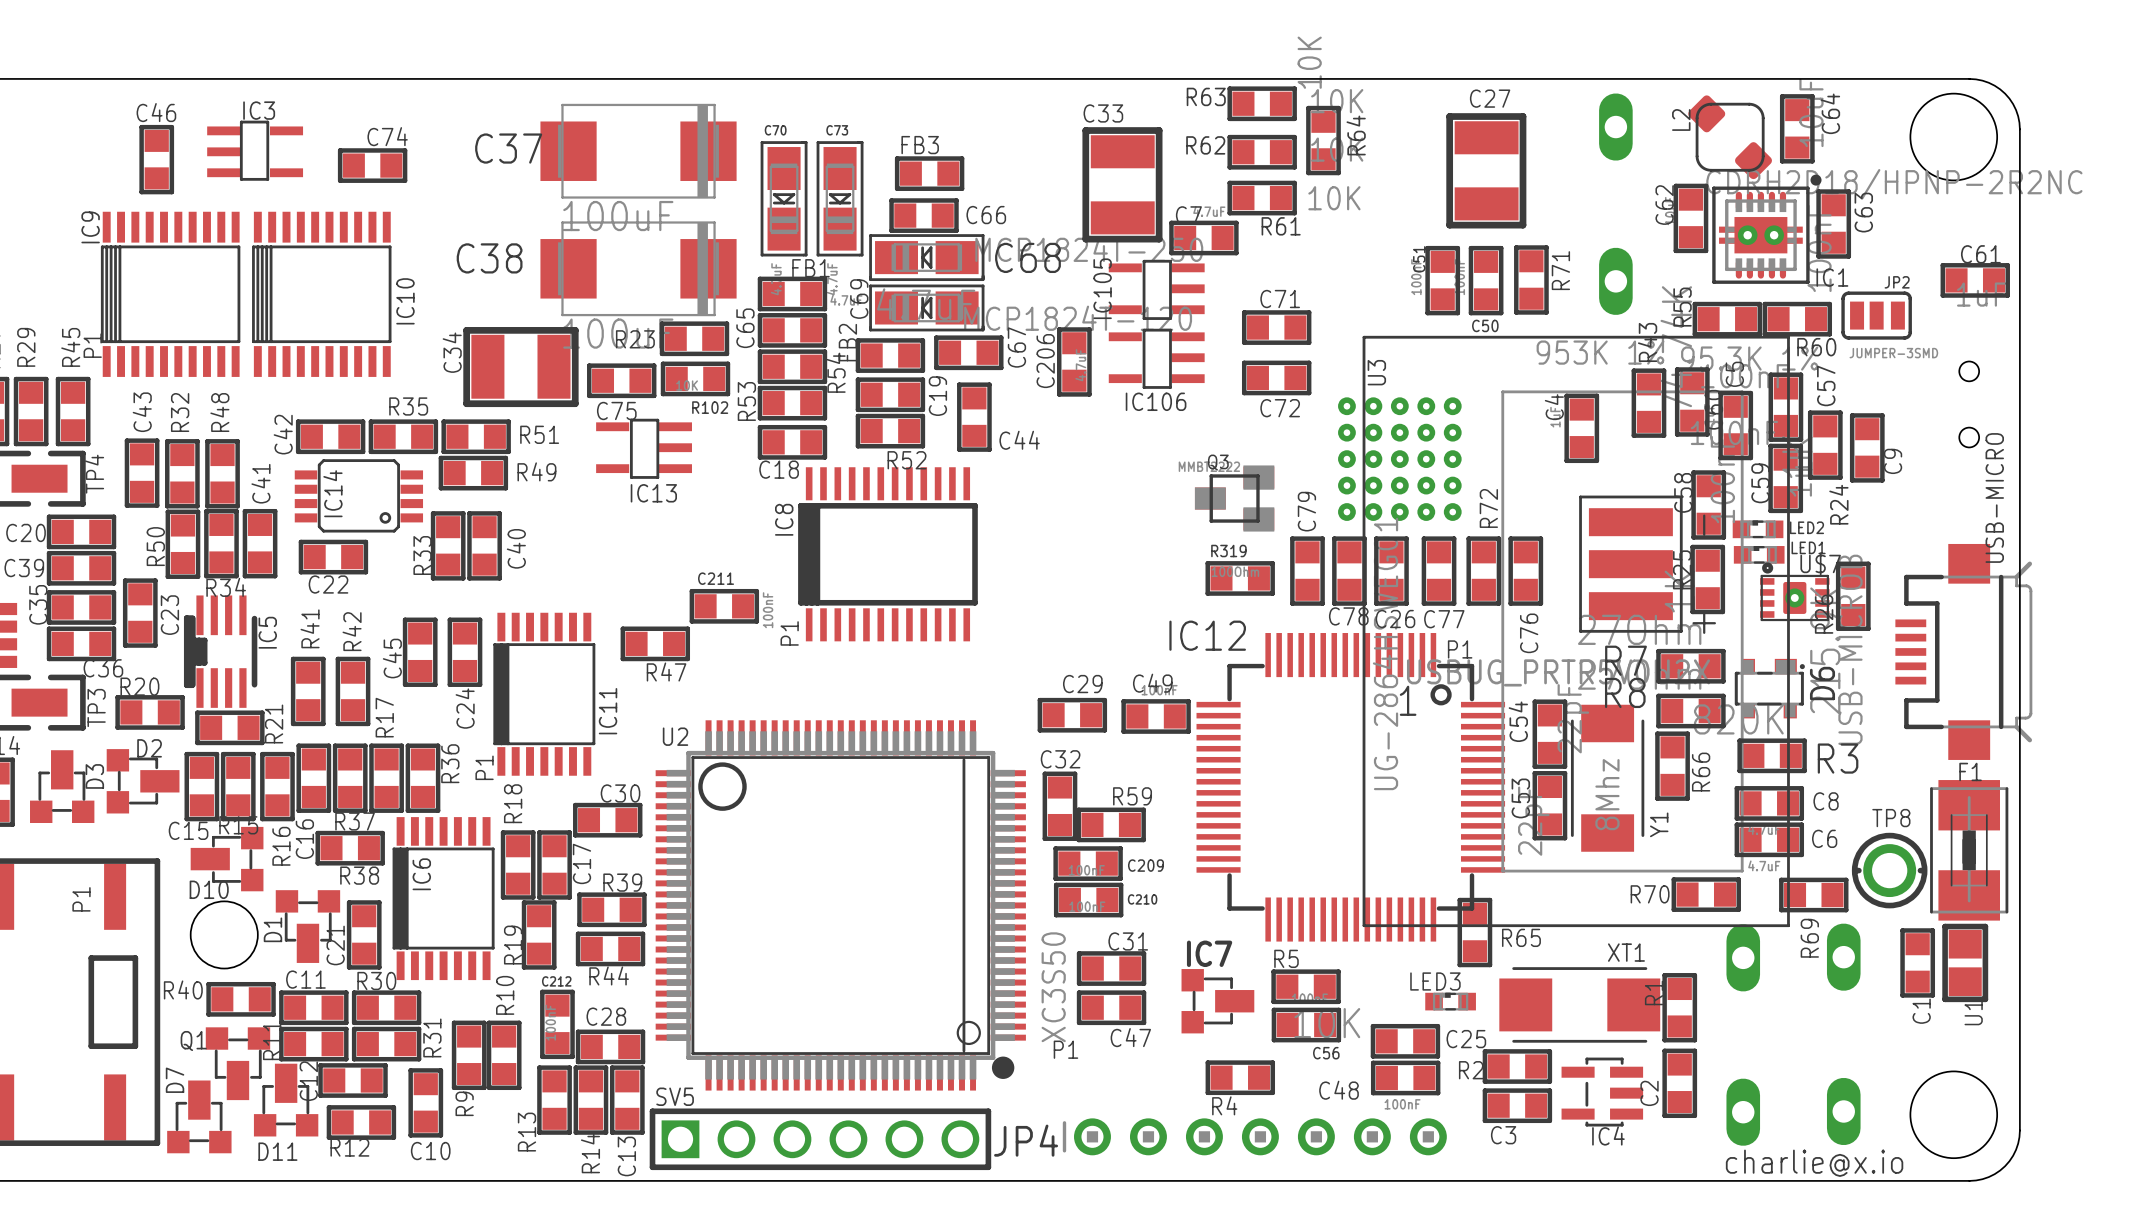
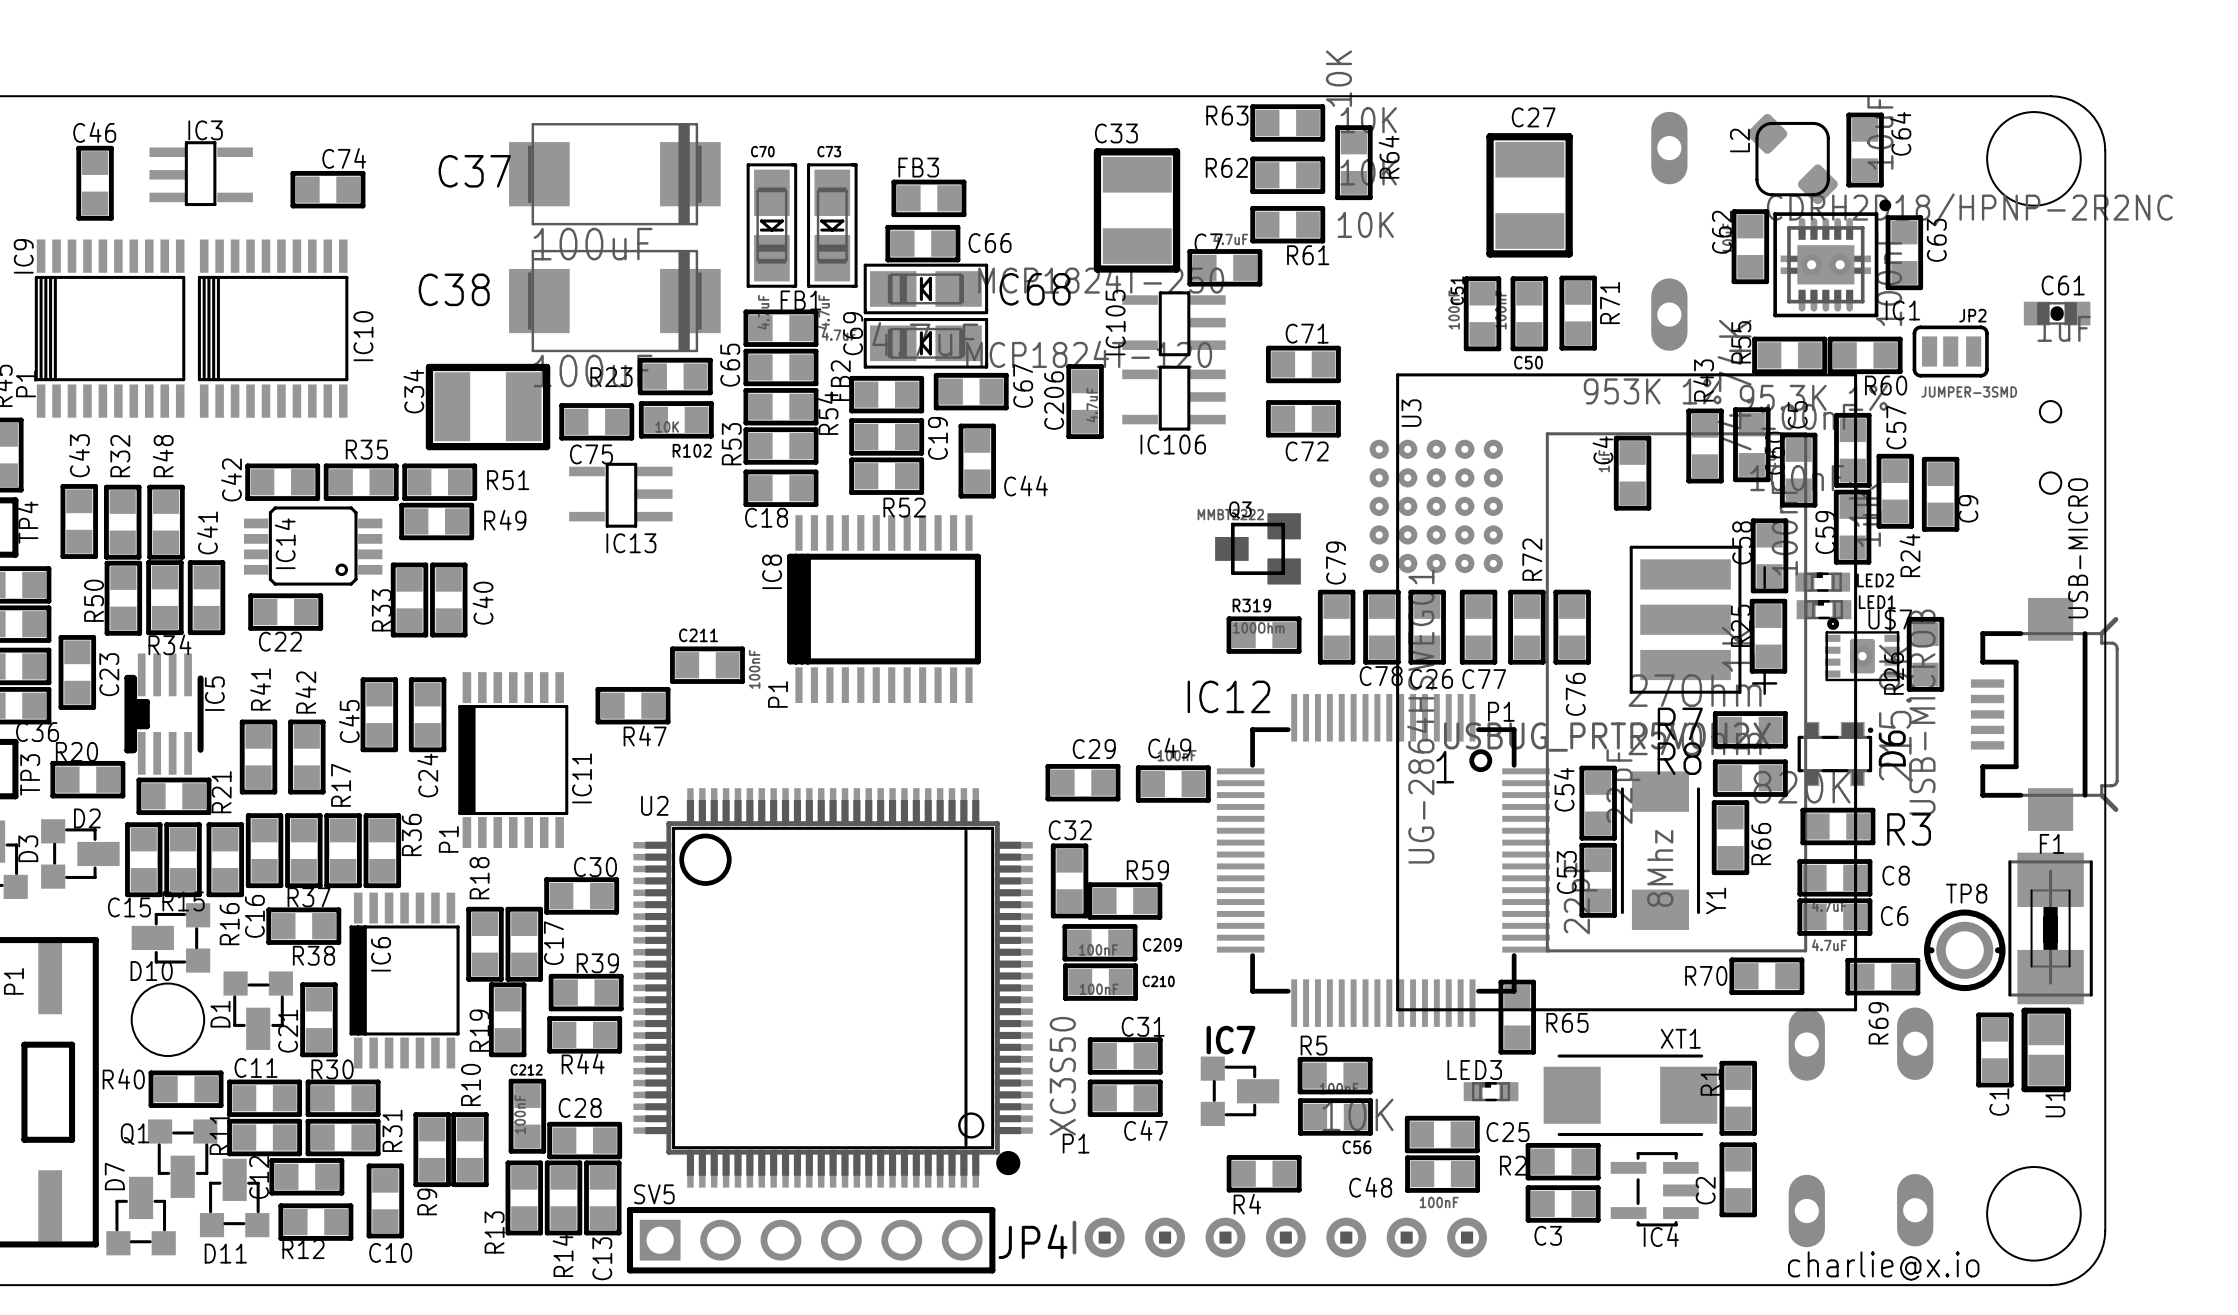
C61 footprint: [1940, 263, 2010, 298] -> [2023, 301, 2091, 326]

